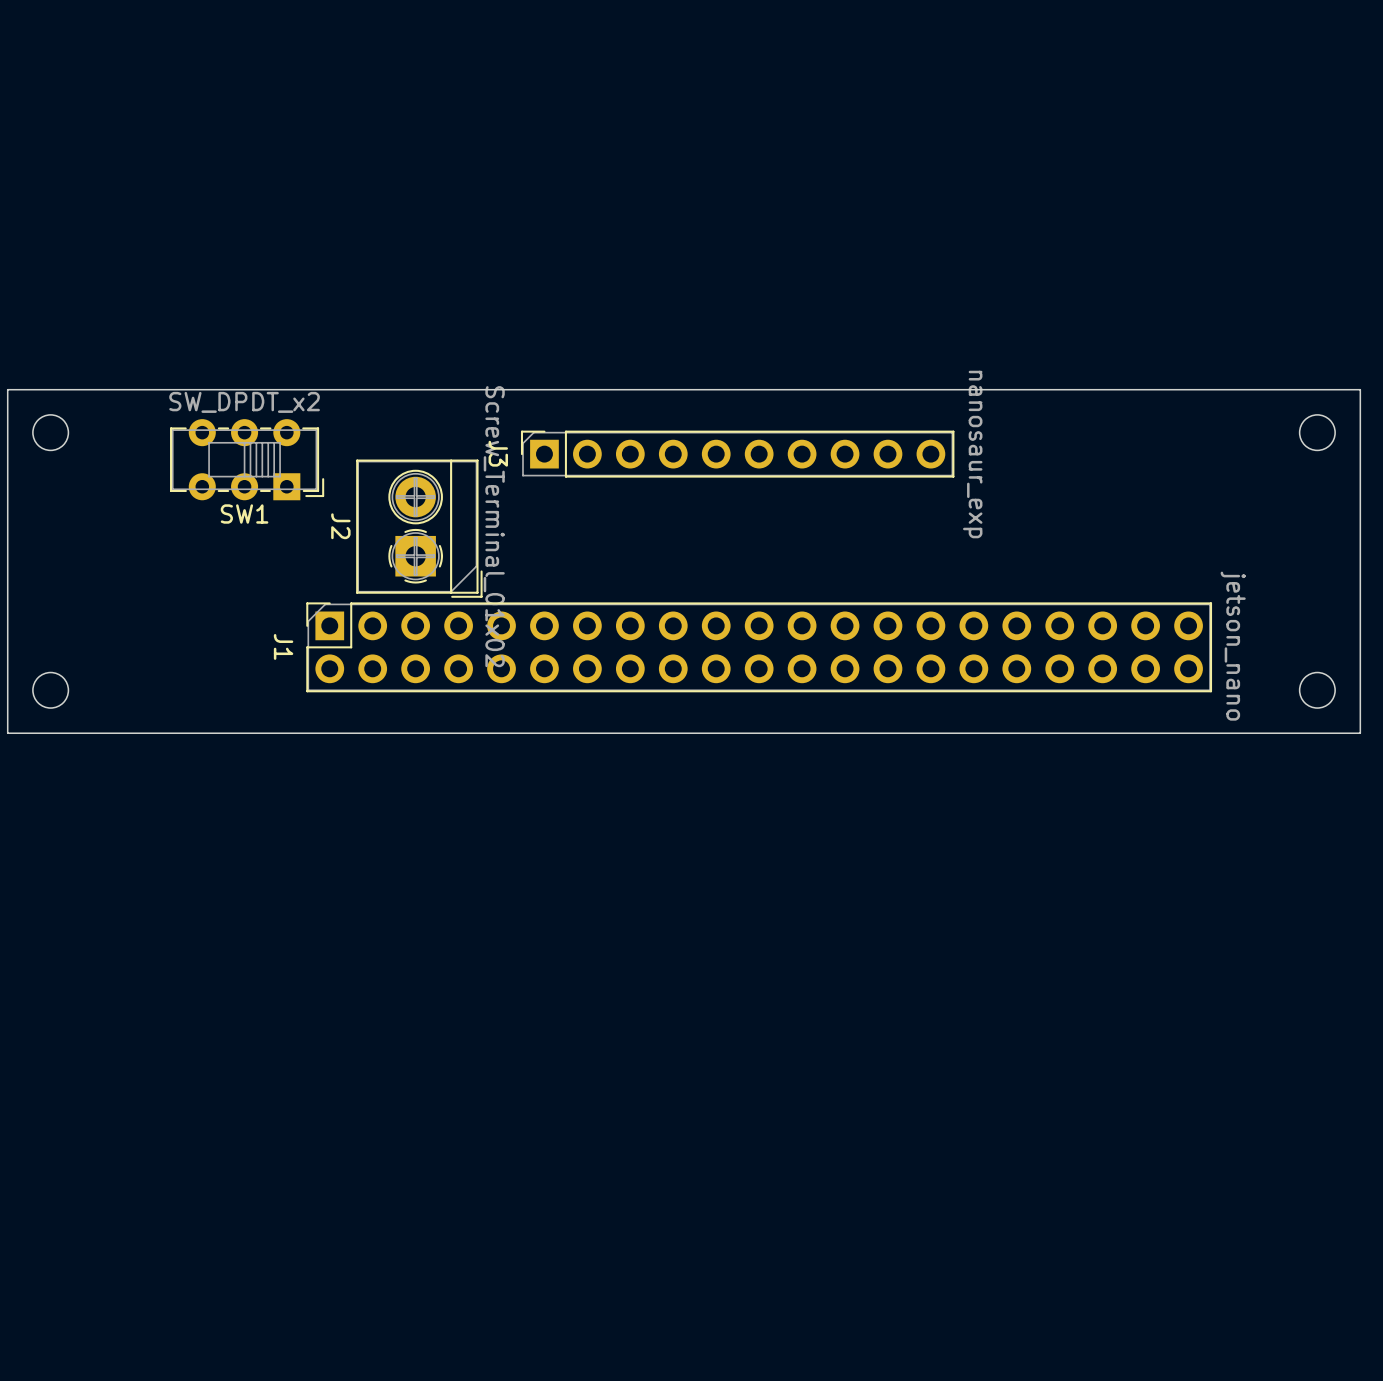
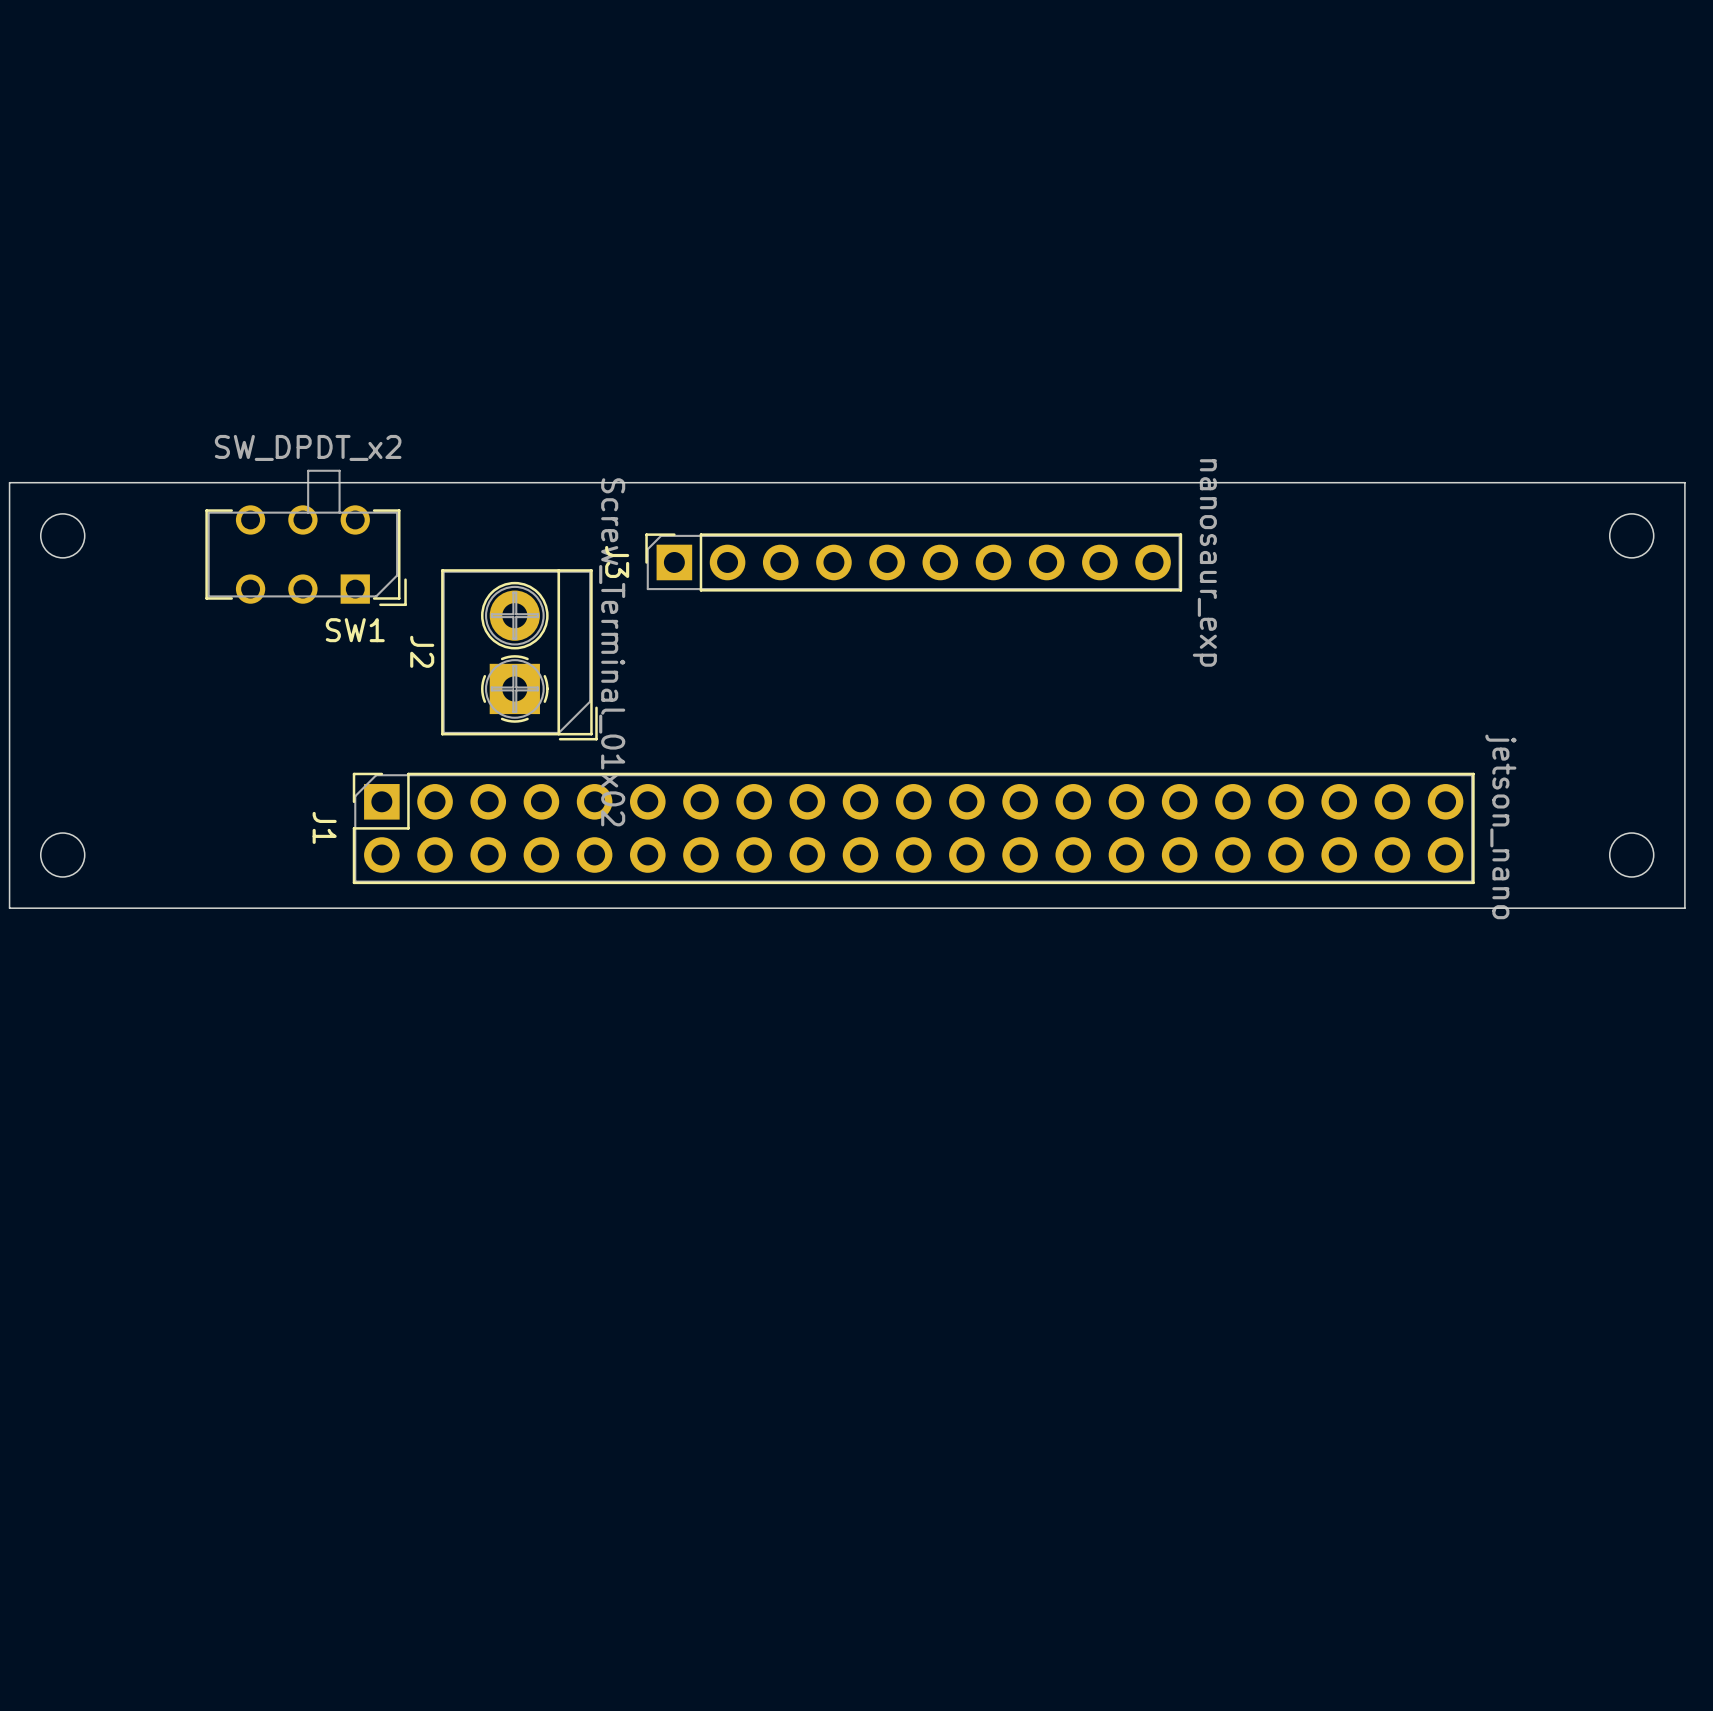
SW1 footprint: [170, 419, 325, 501] -> [205, 469, 407, 607]
SW1 name position: SW1 (244, 514) -> SW1 (355, 630)
J1 position: (759, 647) -> (913, 828)

